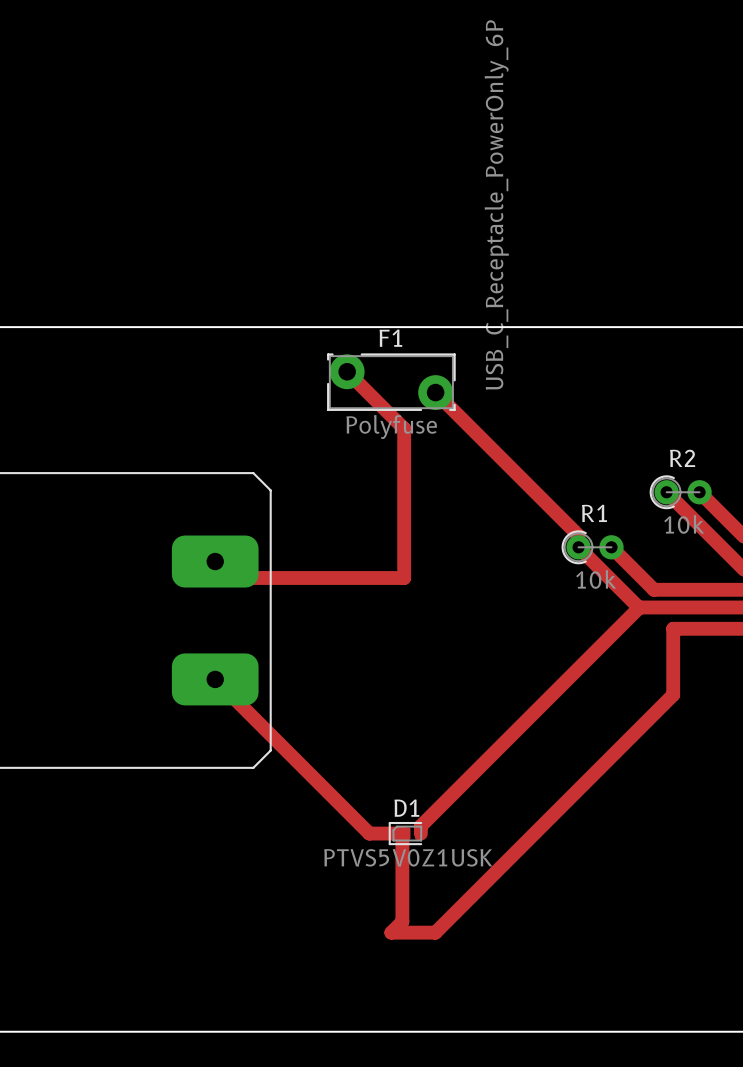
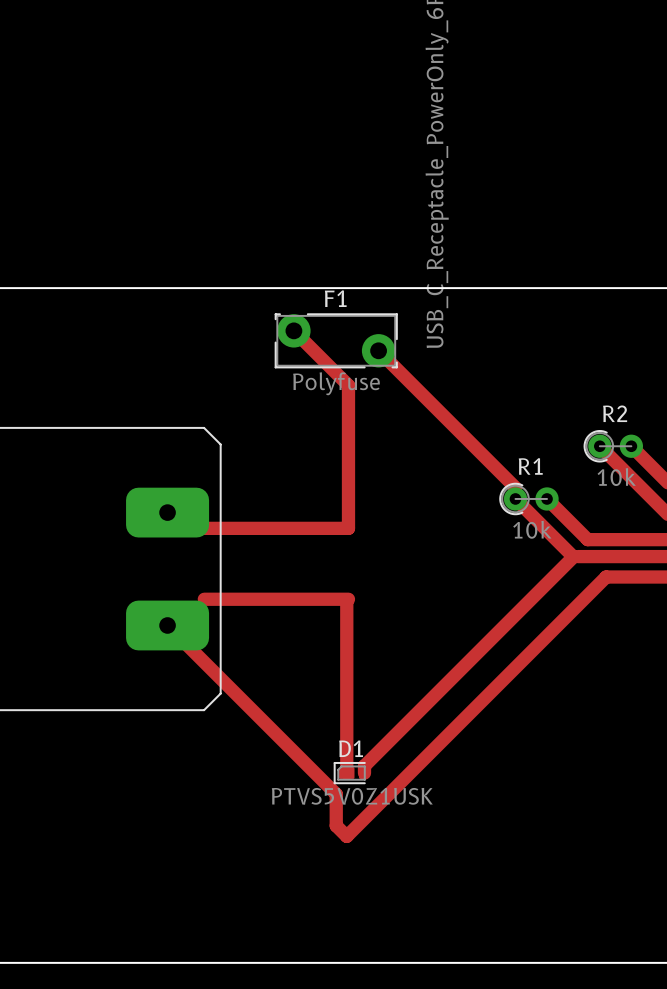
track: (673, 628) (673, 694) (435, 932) (391, 932) (402, 921) (402, 833) (369, 833) -> (606, 577) (346, 836) (336, 825) (336, 794) (315, 773)
track: none -> (167, 625) (178, 625) (204, 599) (348, 599) (346, 600) (346, 773)

